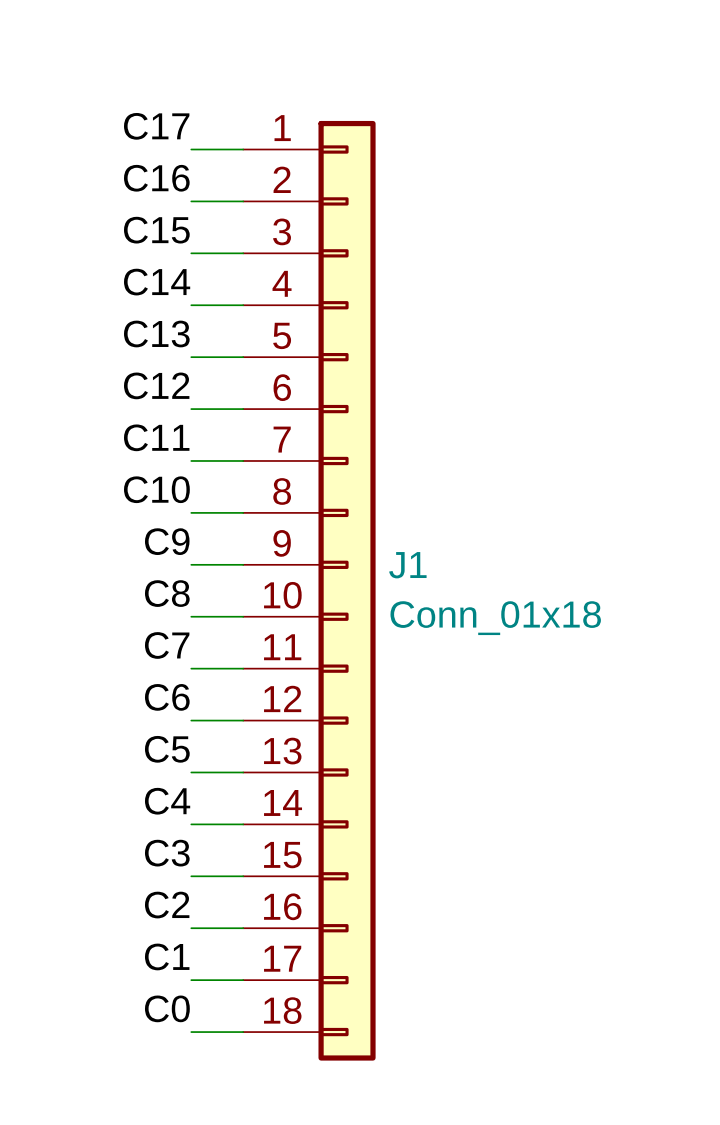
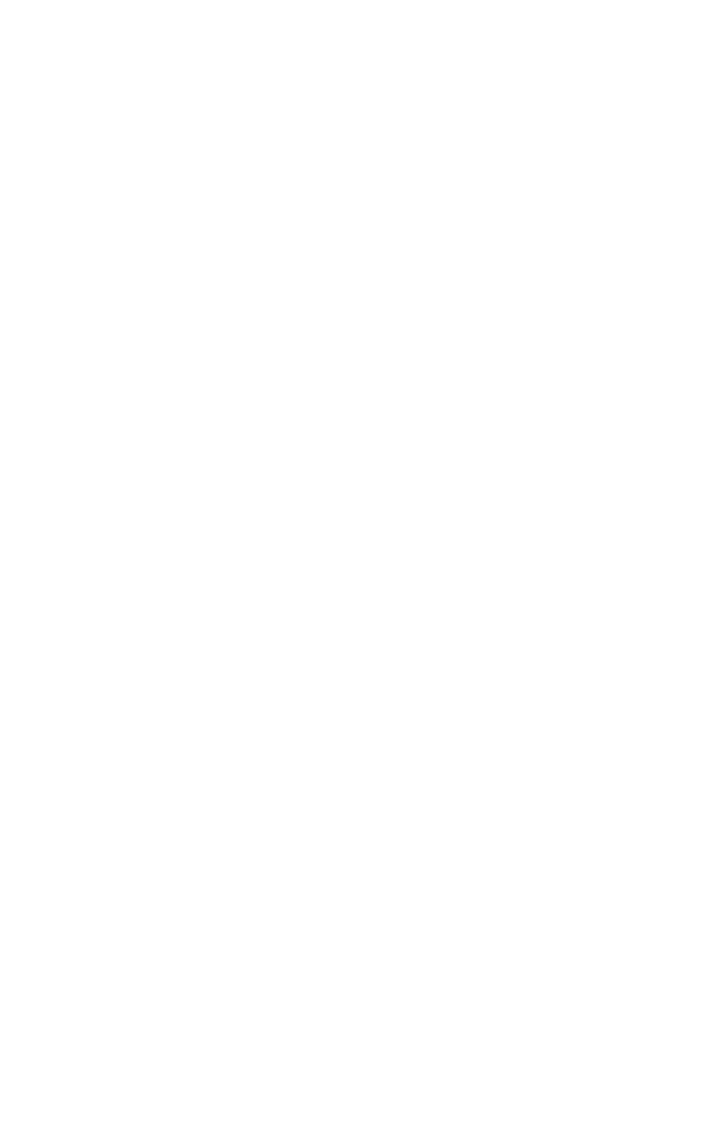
label: C17 (156, 126) -> none
wire: (191, 149) (243, 149) -> none
label: C16 (156, 178) -> none
wire: (191, 201) (243, 201) -> none
label: C15 (156, 230) -> none
wire: (191, 253) (243, 253) -> none
label: C14 (157, 282) -> none
wire: (191, 305) (243, 305) -> none
label: C13 (156, 333) -> none
wire: (191, 357) (243, 357) -> none
label: C12 (156, 385) -> none
wire: (191, 409) (243, 409) -> none
label: C11 (156, 437) -> none
wire: (191, 460) (243, 460) -> none
label: C10 (156, 489) -> none
wire: (191, 512) (243, 512) -> none
label: C9 (167, 541) -> none
wire: (191, 564) (243, 564) -> none
J1: Conn_01x18 (309, 590) -> none
label: C8 (167, 593) -> none
wire: (191, 616) (243, 616) -> none
label: C7 (167, 645) -> none
wire: (191, 668) (243, 668) -> none
label: C6 (167, 697) -> none
wire: (191, 720) (243, 720) -> none
label: C5 (167, 749) -> none
wire: (191, 772) (243, 772) -> none
label: C4 (167, 801) -> none
wire: (191, 824) (243, 824) -> none
label: C3 (167, 853) -> none
wire: (191, 876) (243, 876) -> none
label: C2 (167, 905) -> none
wire: (191, 928) (243, 928) -> none
label: C1 (167, 956) -> none
wire: (191, 980) (243, 980) -> none
label: C0 (167, 1008) -> none
wire: (191, 1032) (243, 1032) -> none

